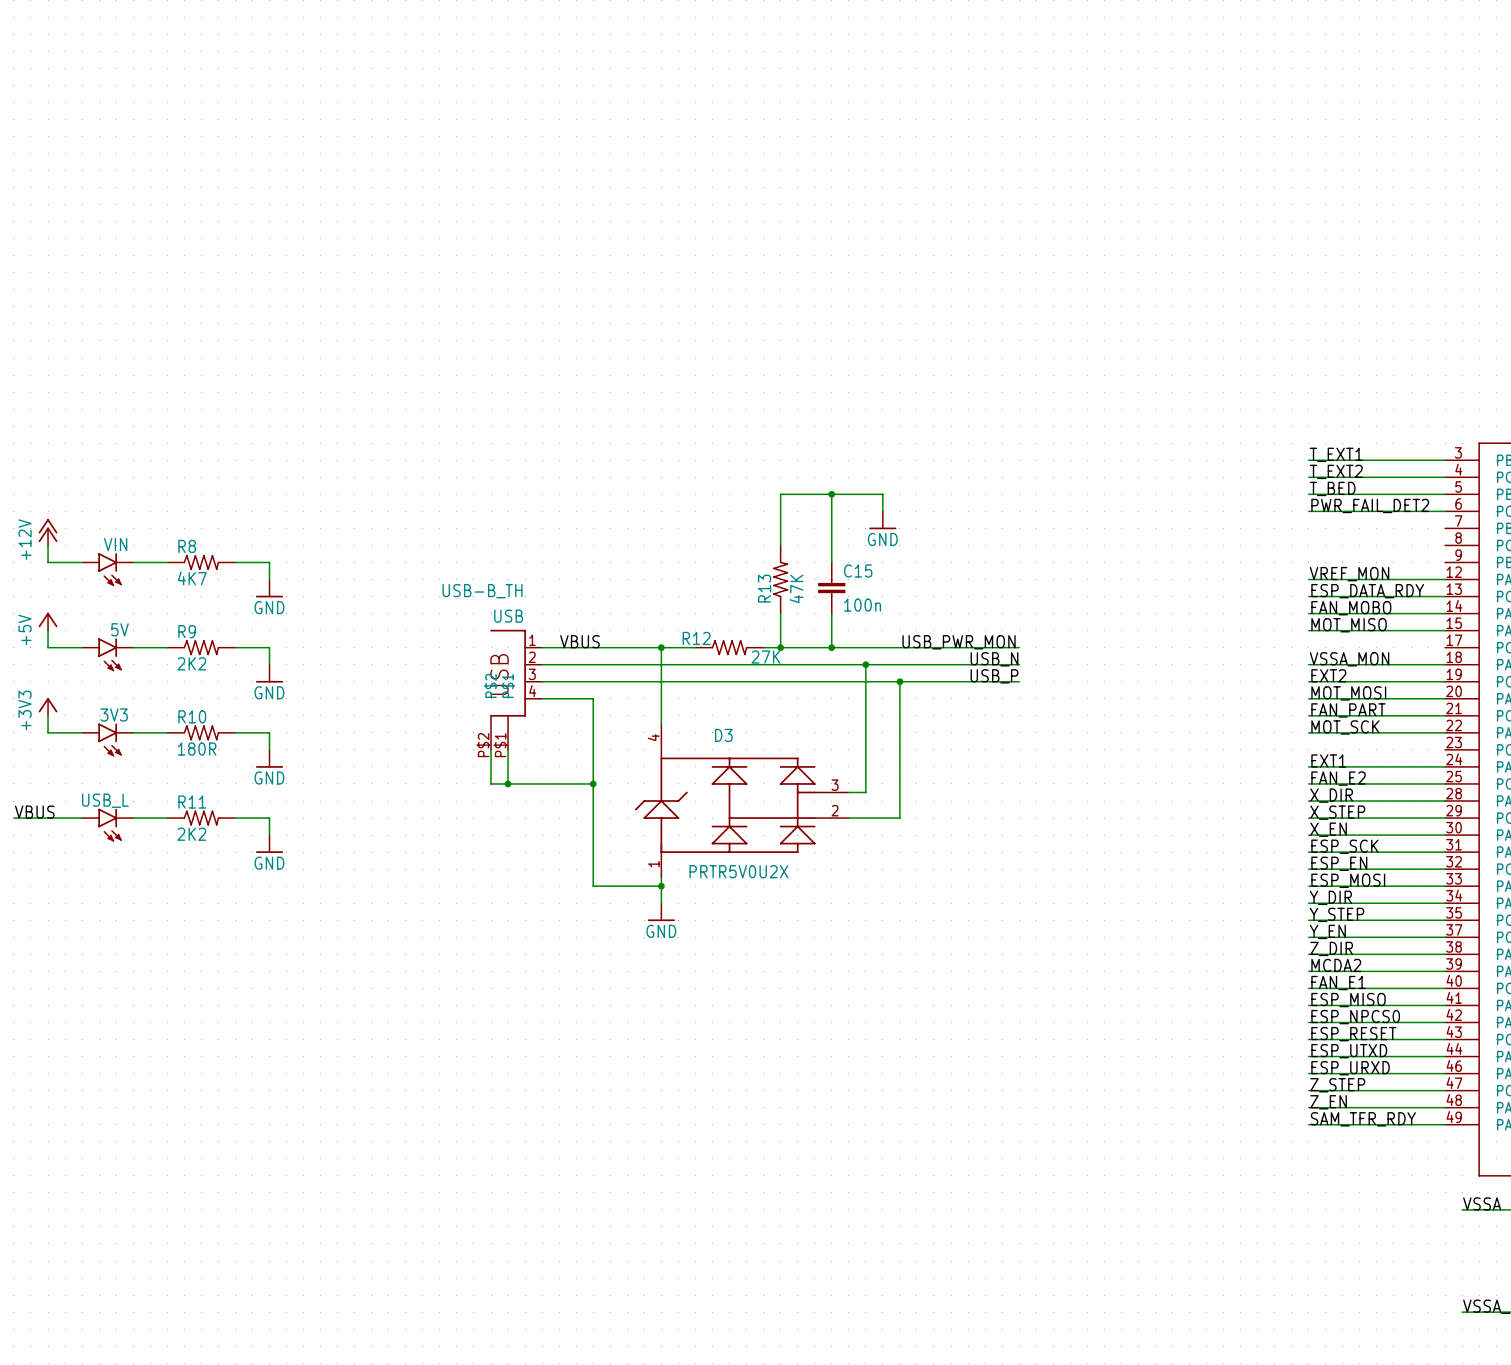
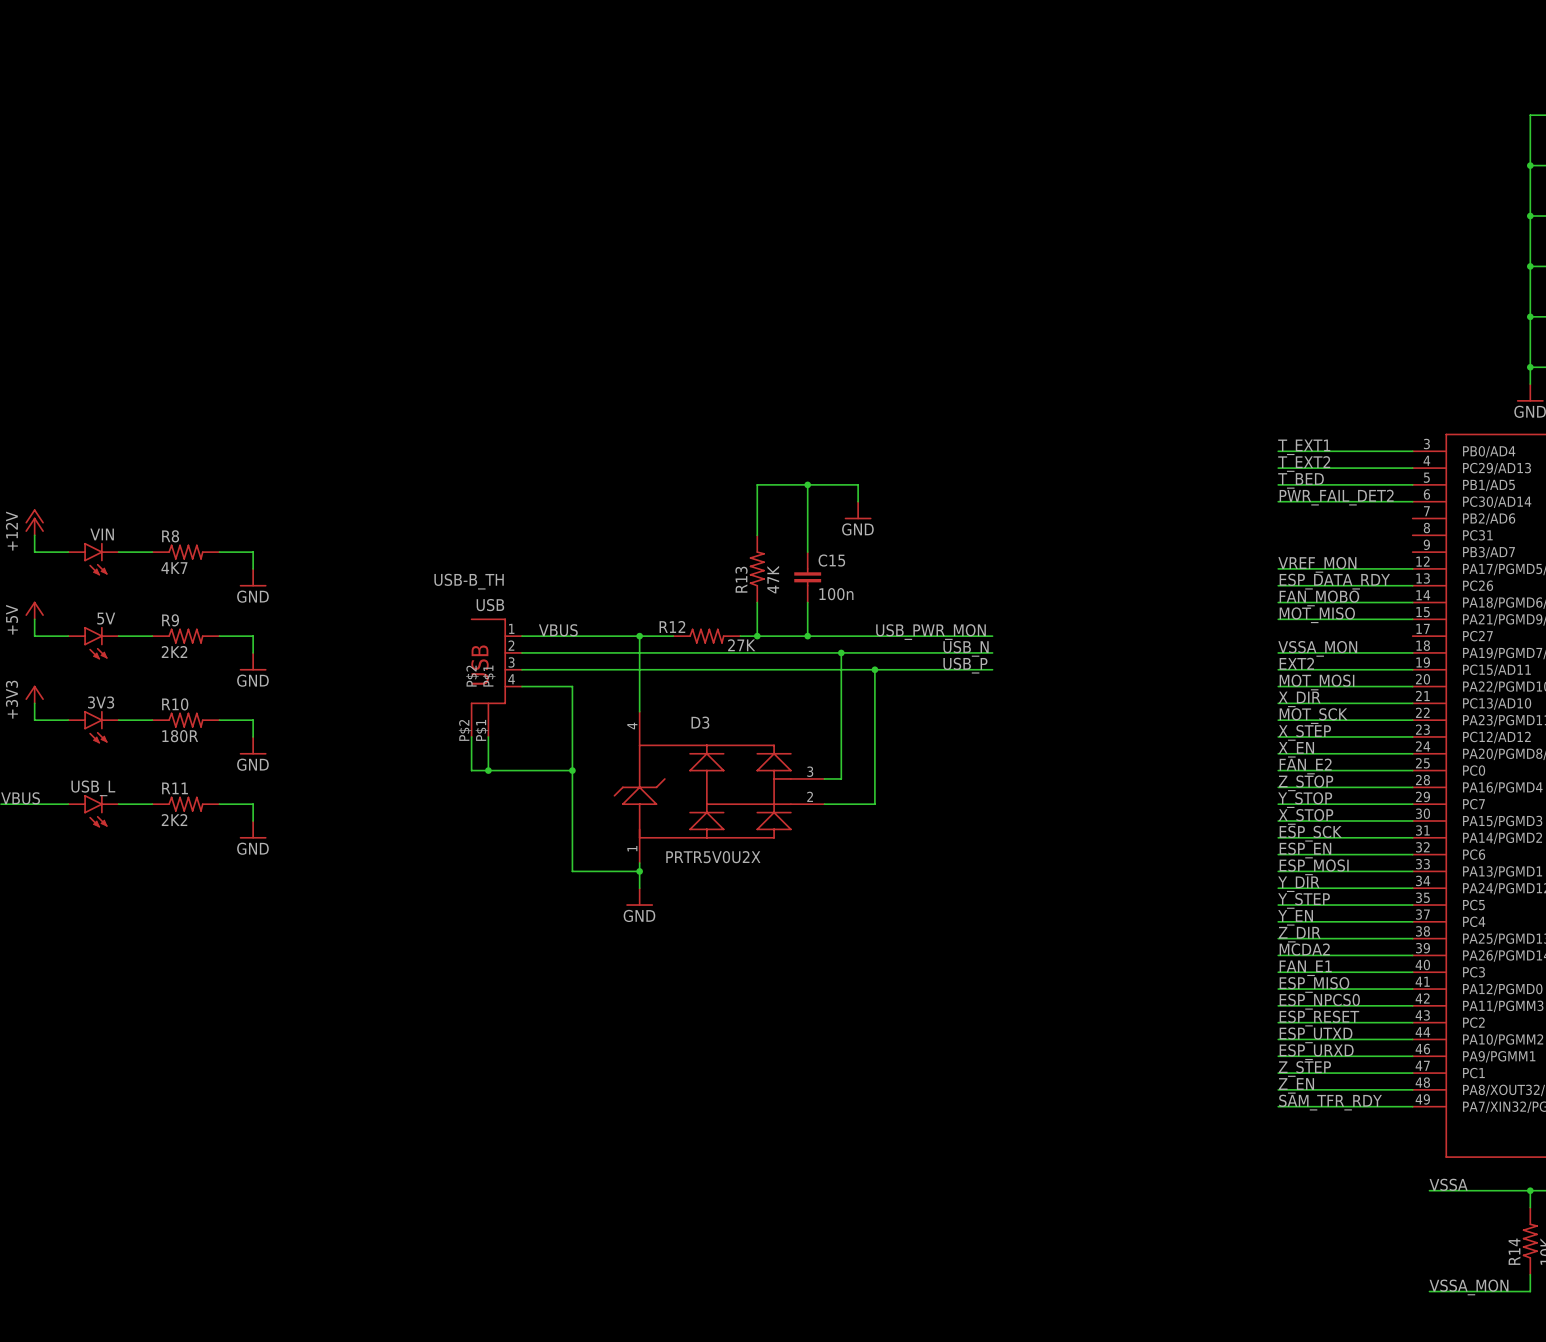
label: FAN_PART (1348, 710) -> X_DIR (1299, 699)
label: none -> X_STEP (1304, 732)
wire: none -> (1278, 736) (1412, 736)
label: EXT1 (1328, 760) -> X_EN (1296, 749)
label: X_DIR (1331, 795) -> Z_STOP (1306, 783)
label: X_STEP (1337, 812) -> Y_STOP (1305, 800)
label: X_EN (1328, 829) -> X_STOP (1305, 816)

